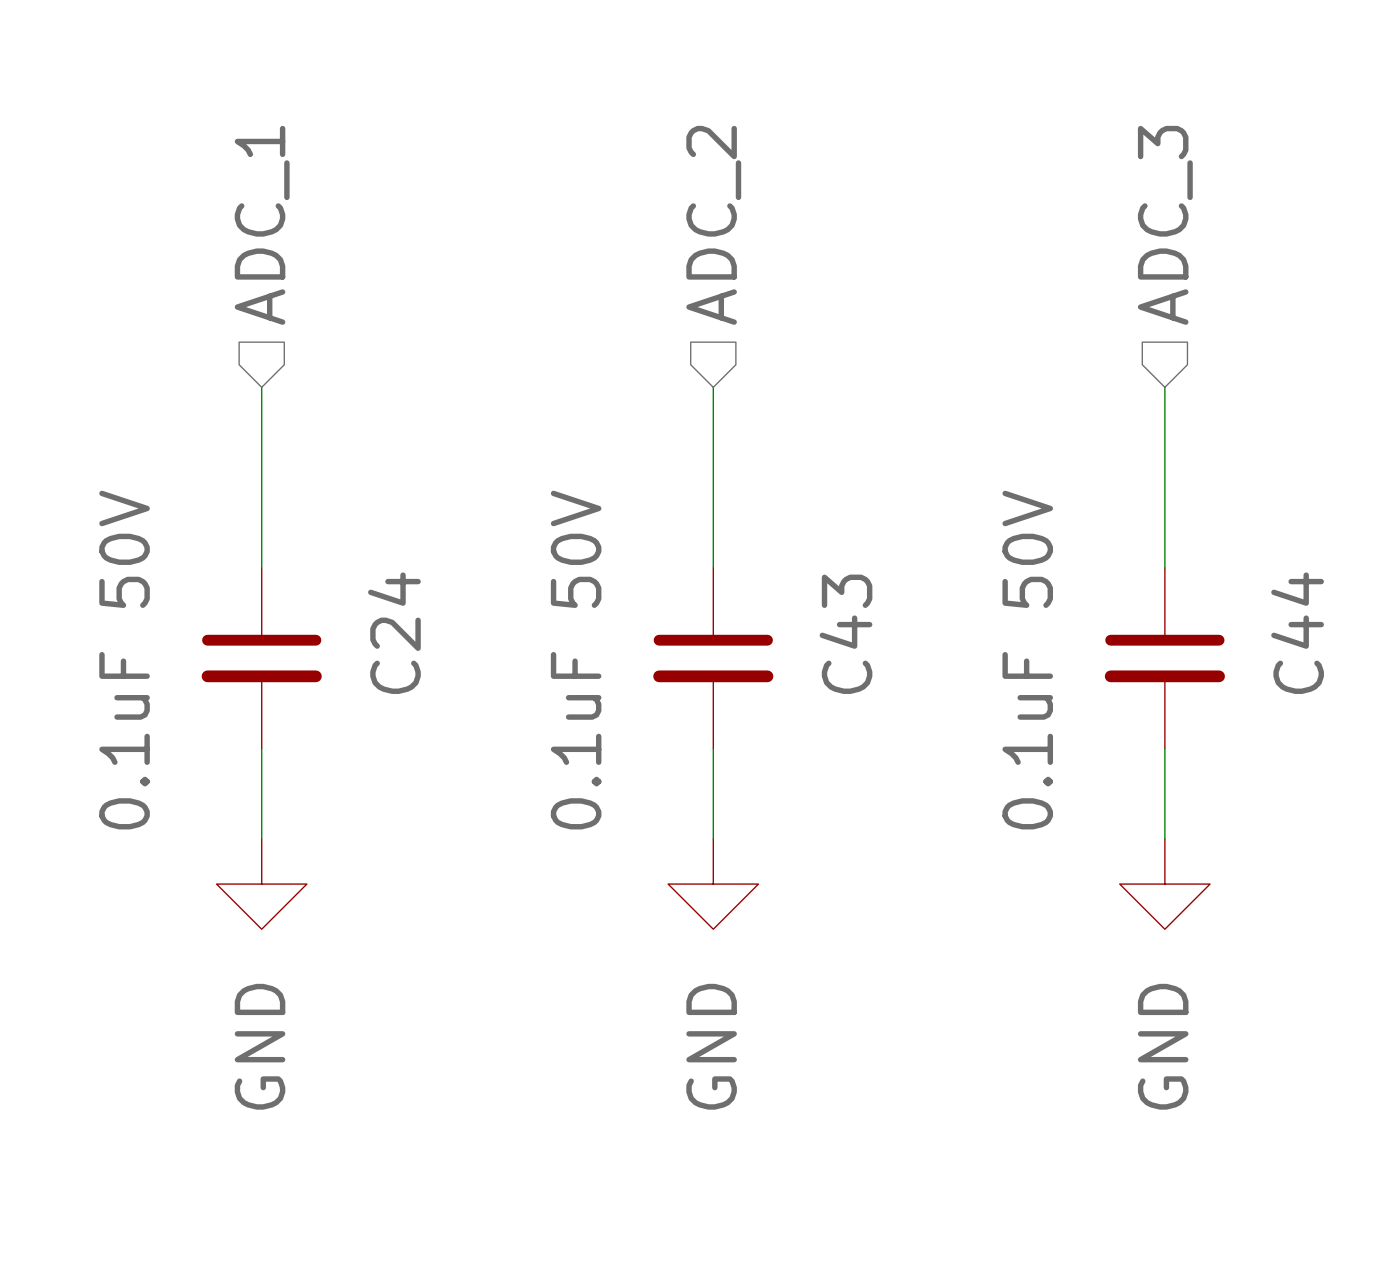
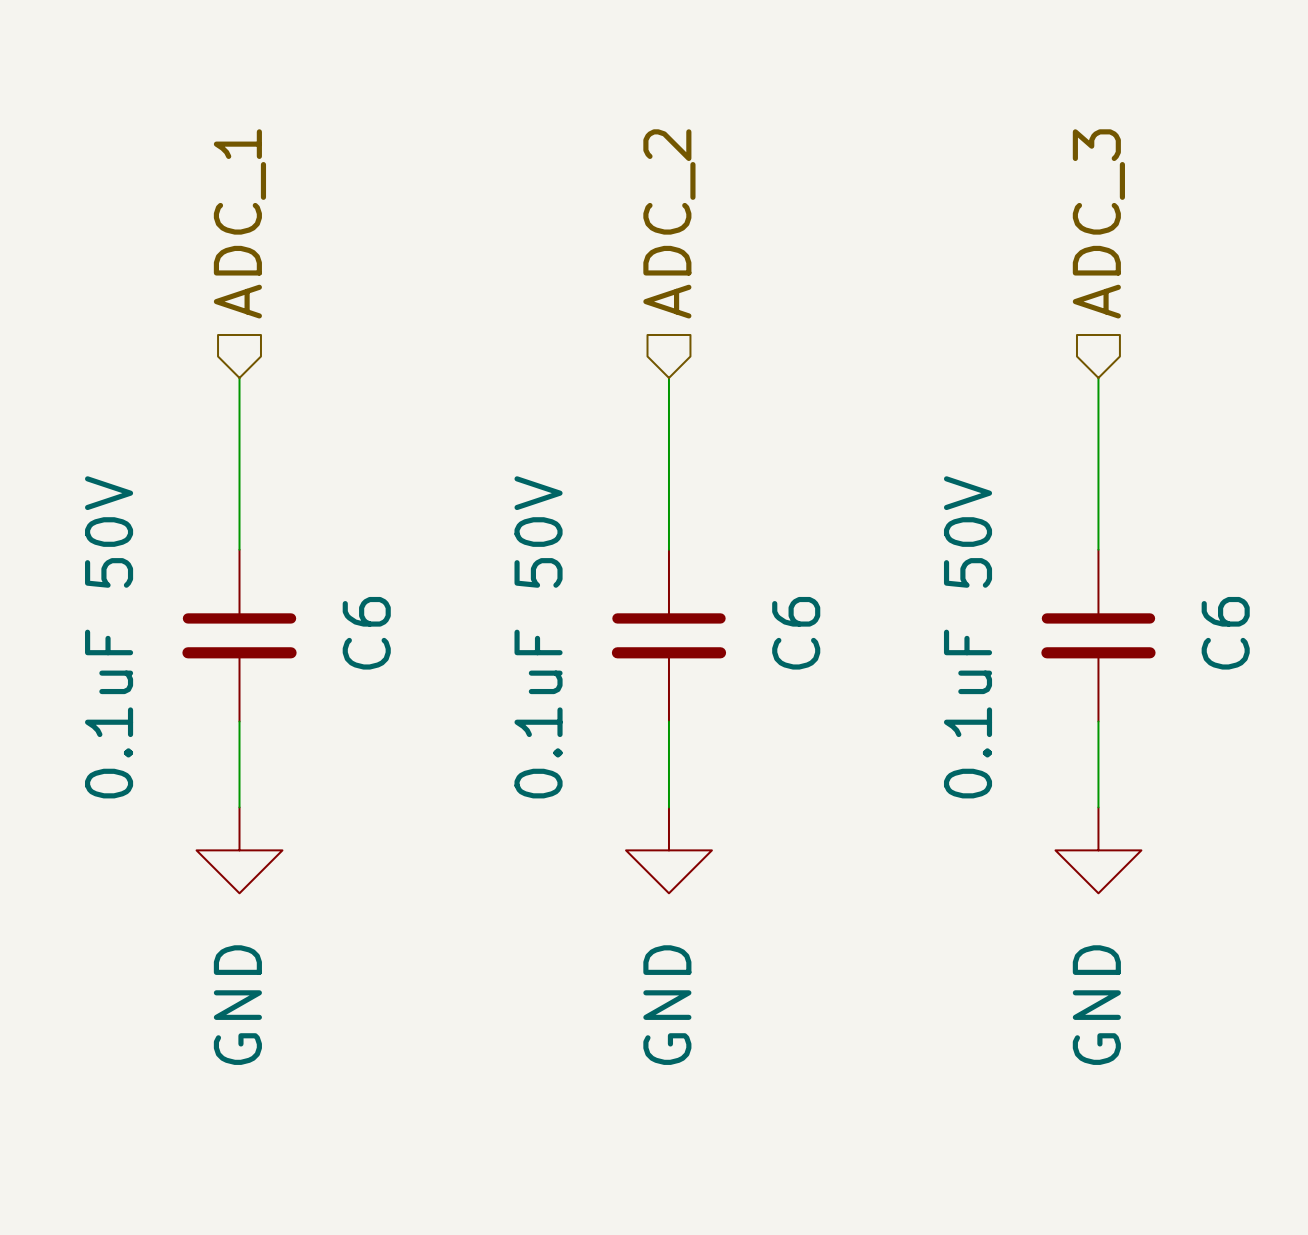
C24 name: C24 (394, 633) -> C6 (366, 633)
C44 name: C44 (1297, 633) -> C6 (1225, 633)
C43 name: C43 (846, 634) -> C6 (796, 633)

